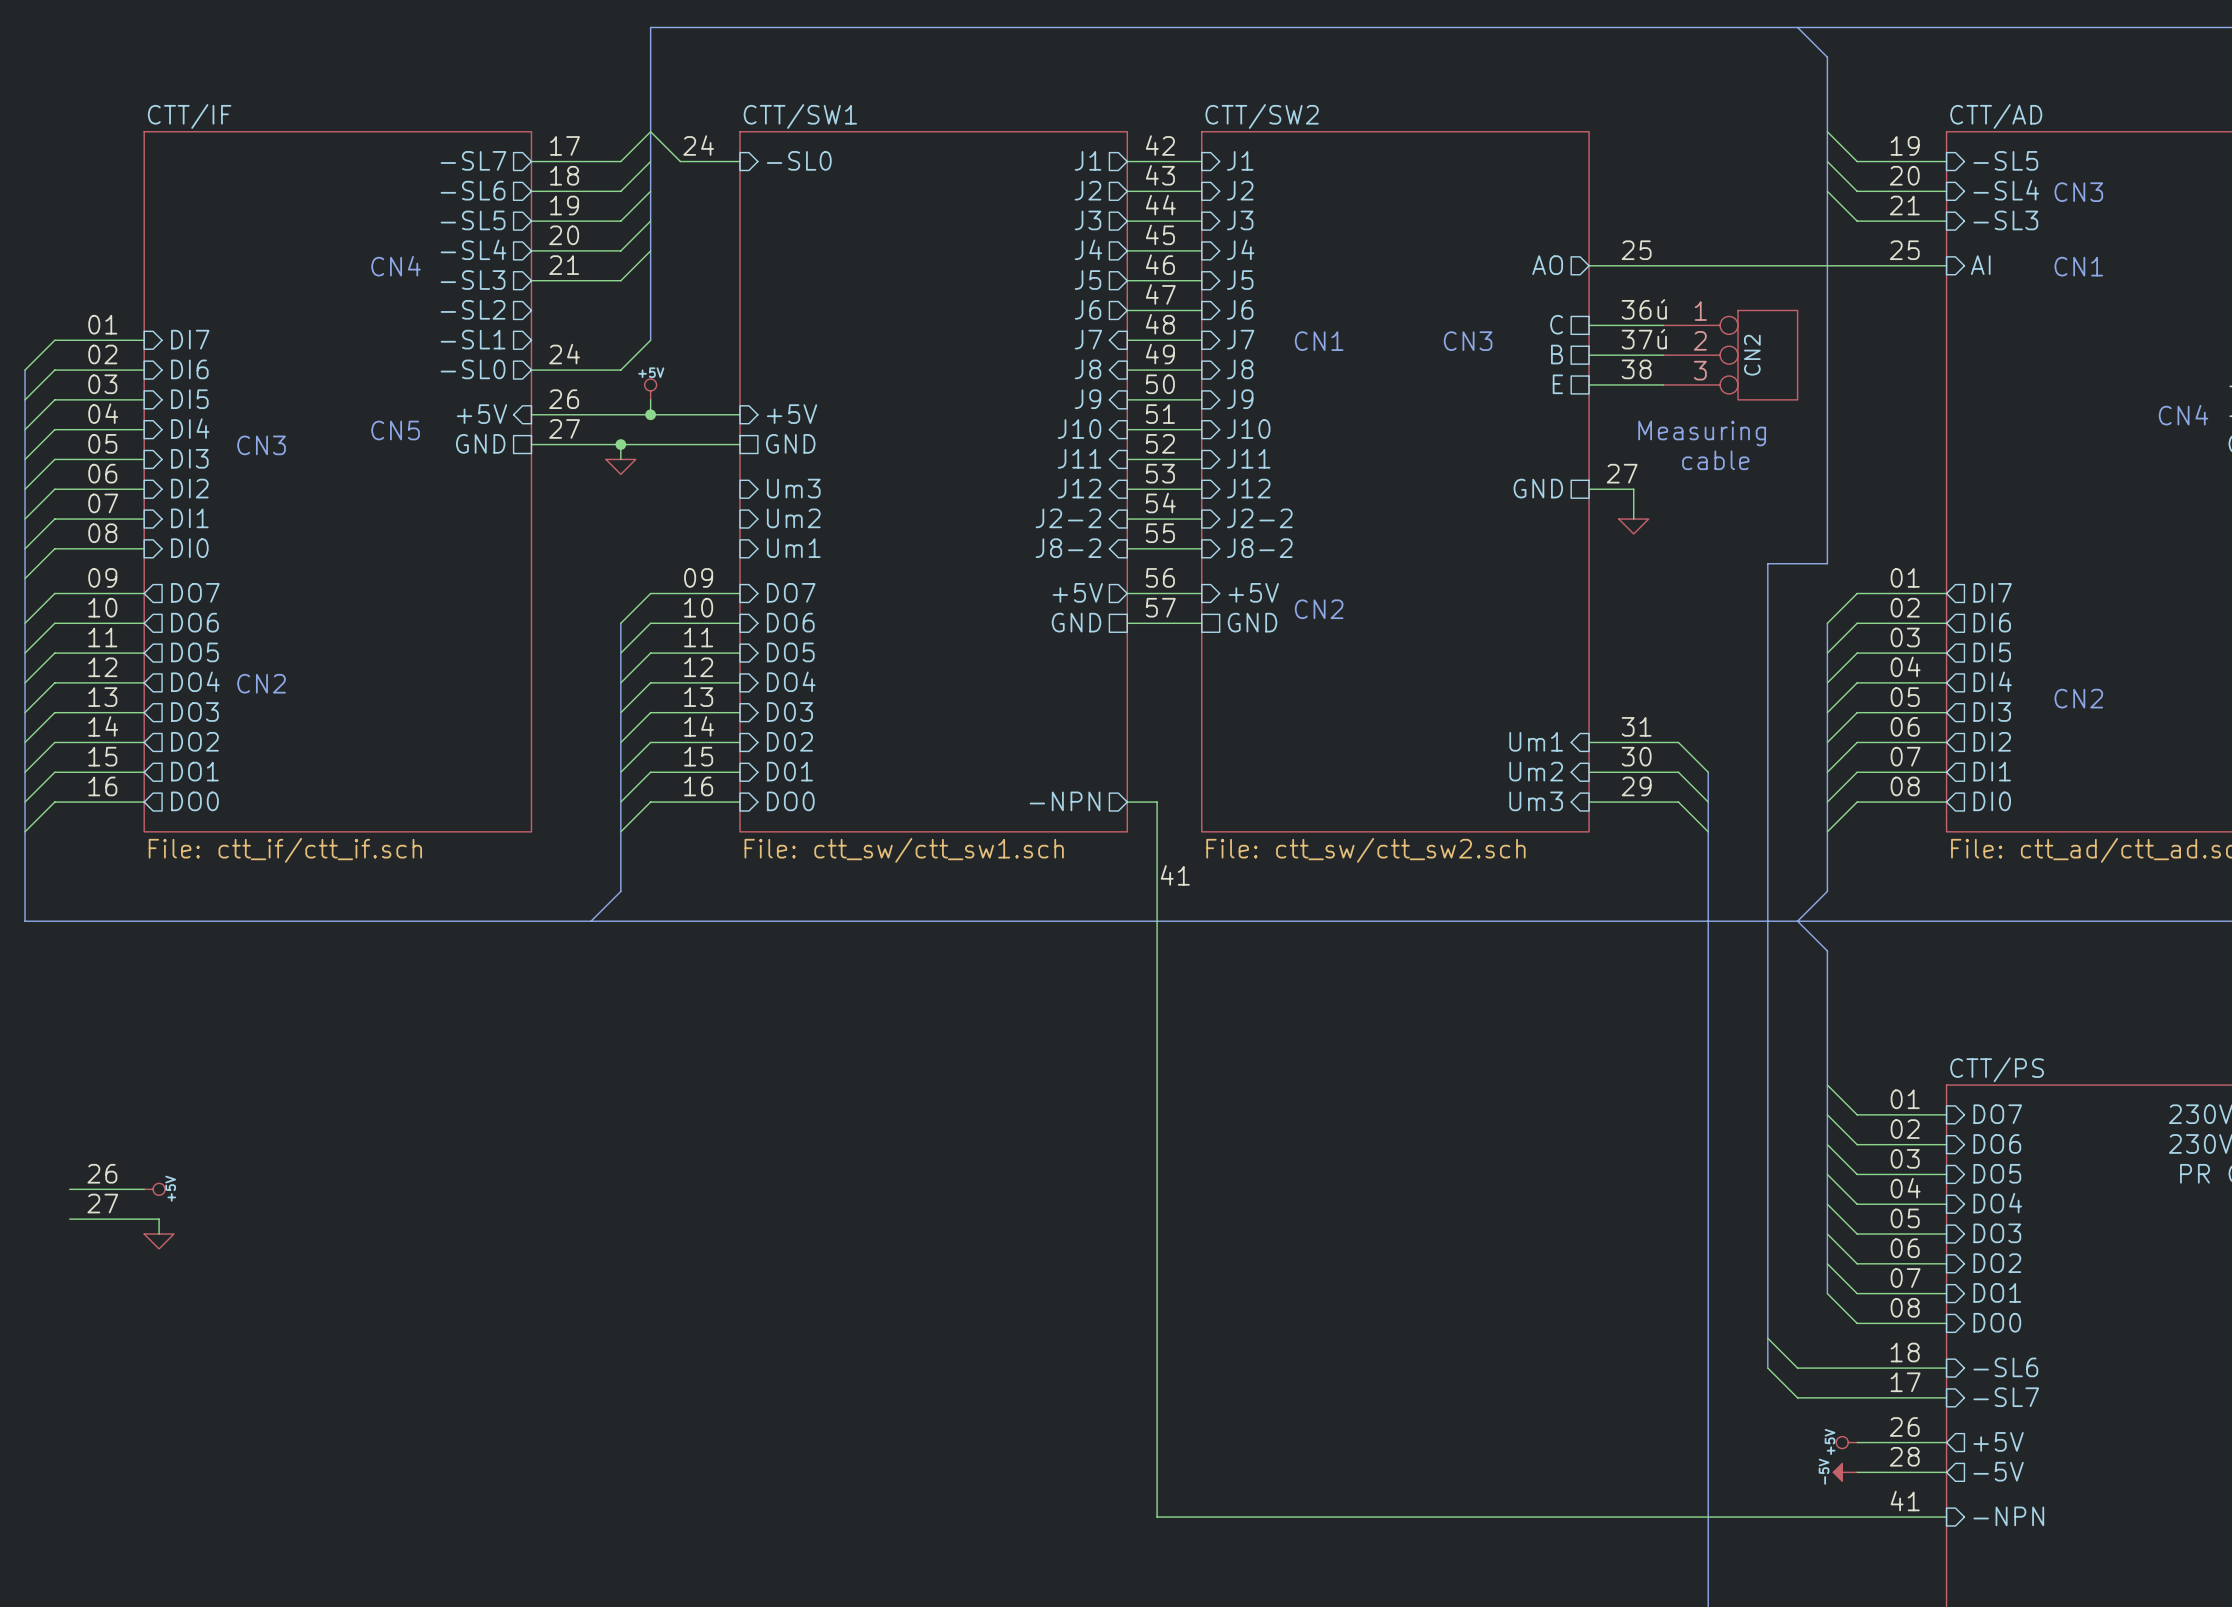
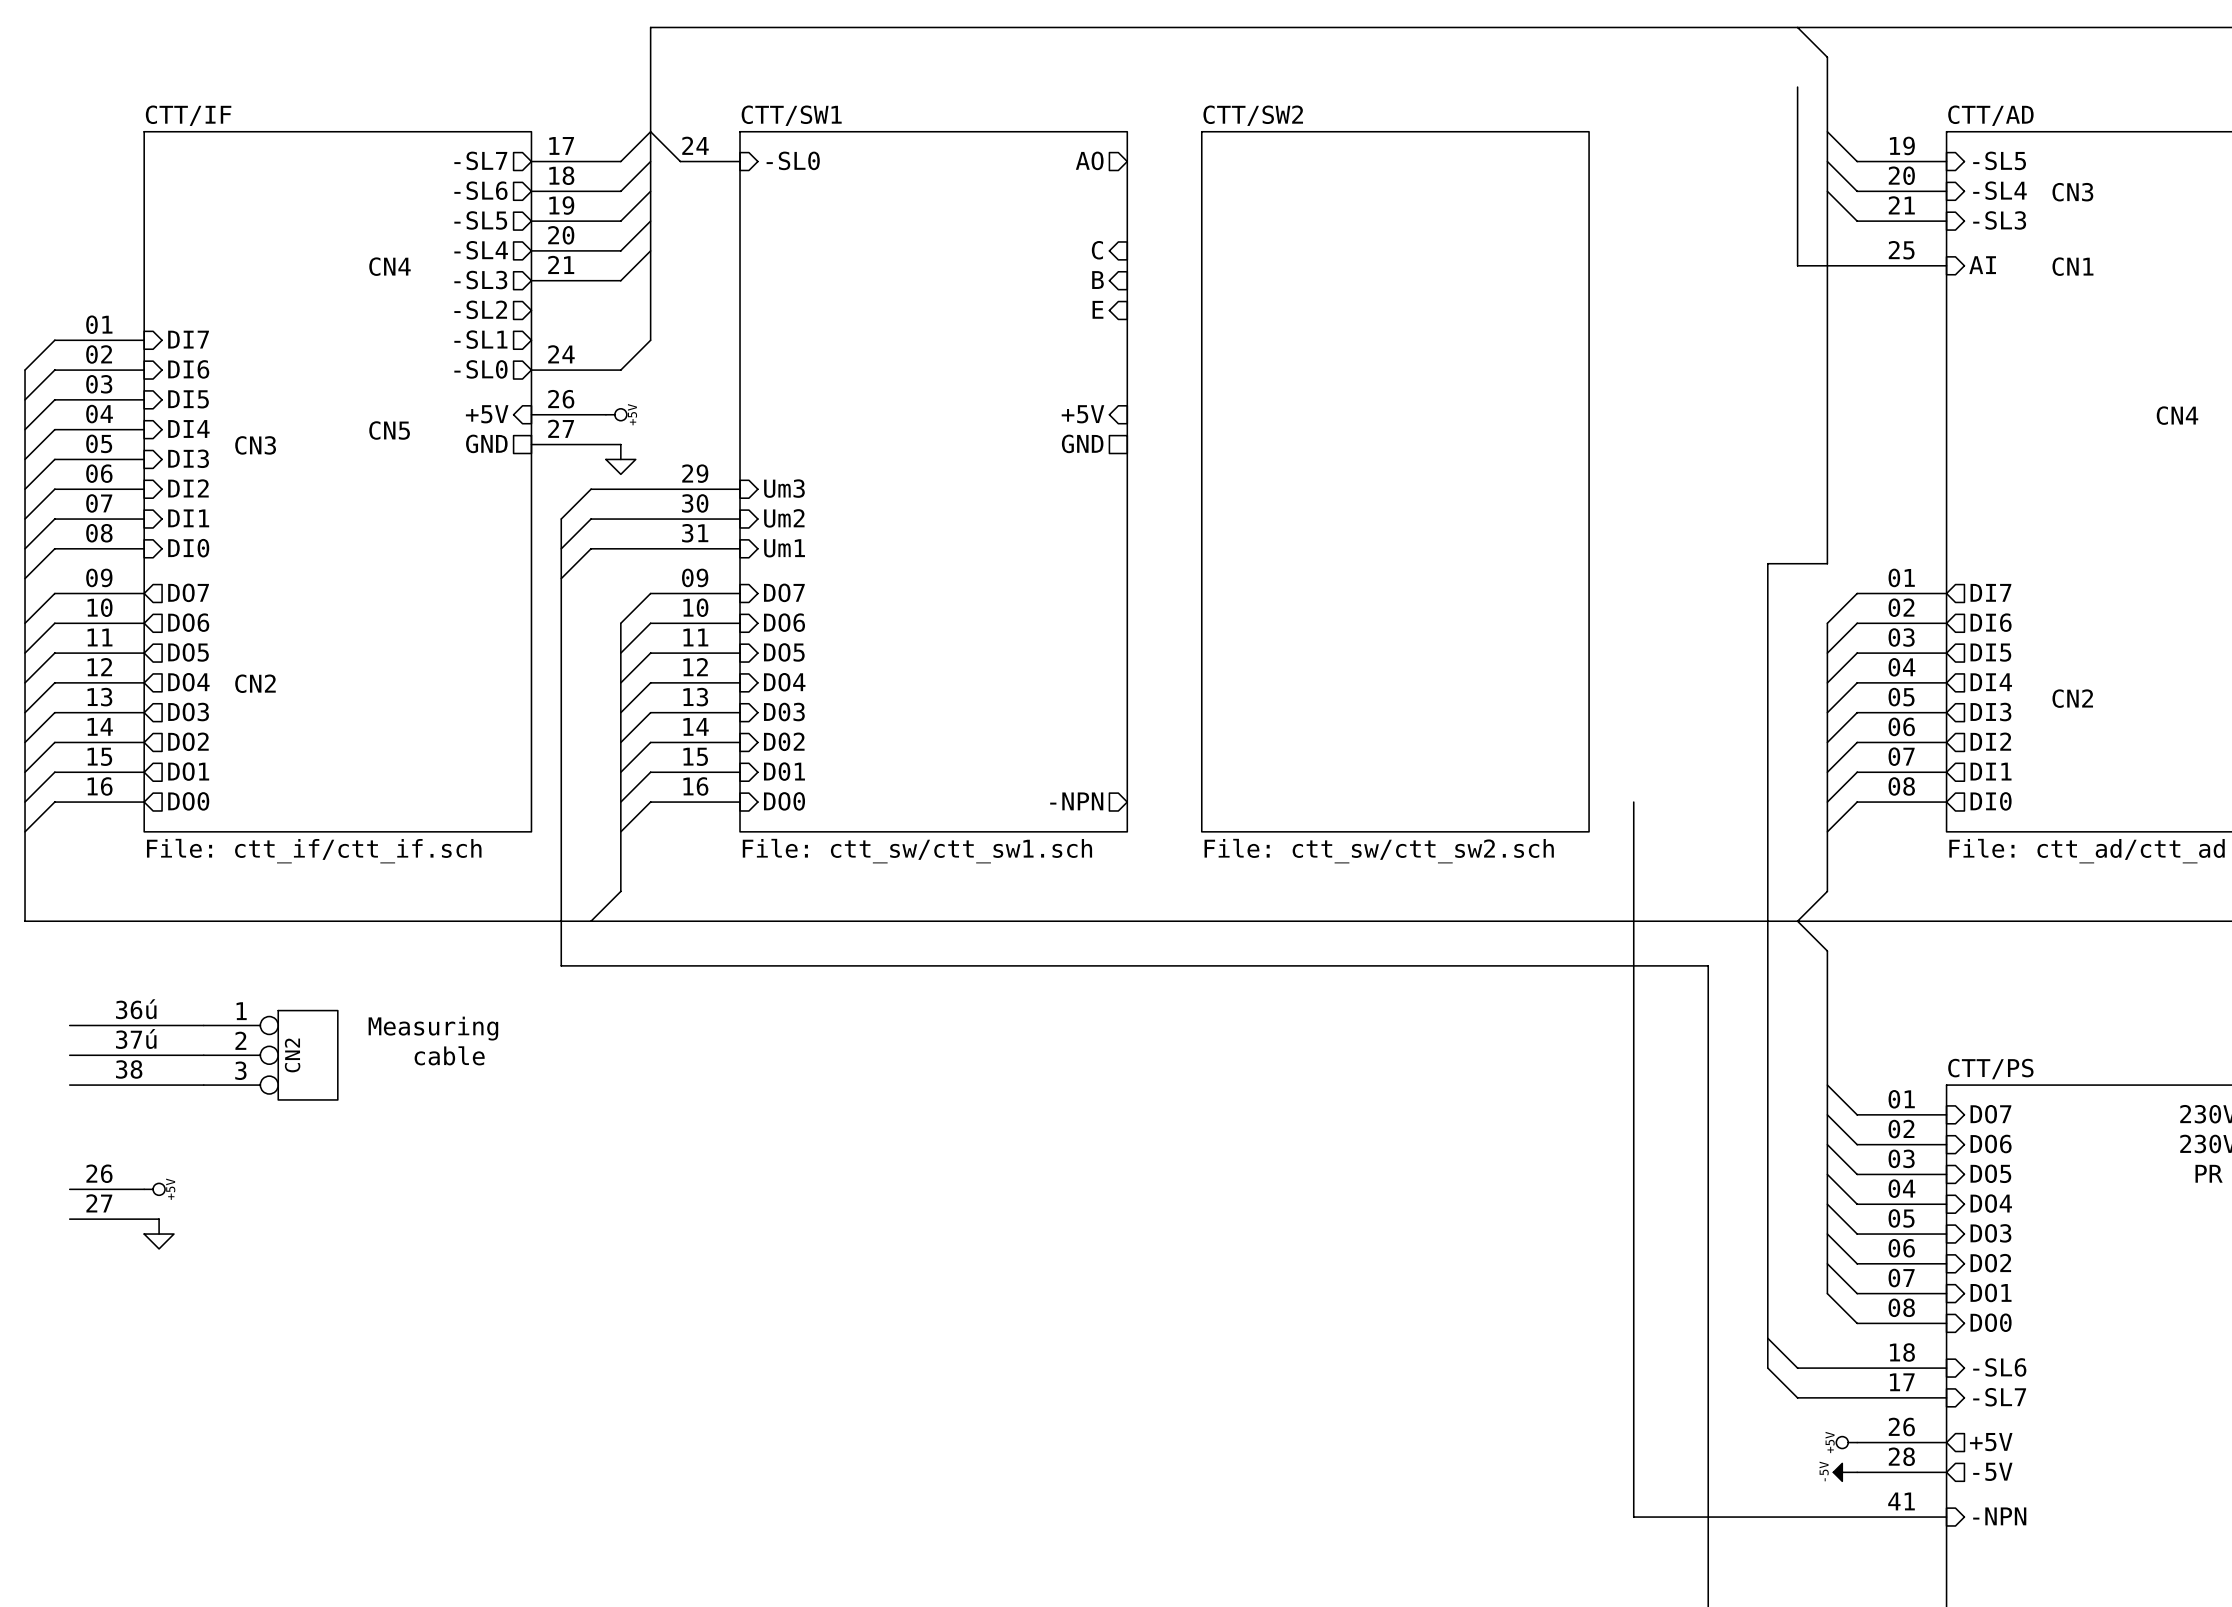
label: 42 (1160, 145) -> none
sheet pin: J1 (1088, 160) -> AO (1089, 160)
sheet pin: J1 (1240, 160) -> none
wire: (1127, 161) (1201, 161) -> none
label: 43 (1160, 175) -> none
sheet pin: J2 (1088, 190) -> none
sheet pin: J2 (1240, 190) -> none
wire: (1127, 191) (1201, 191) -> none
label: 44 (1160, 205) -> none
sheet pin: J3 (1088, 220) -> none
sheet pin: J3 (1240, 220) -> none
wire: (1127, 221) (1201, 221) -> none
label: 45 (1160, 234) -> none
sheet pin shape: output (1088, 249) -> input (1097, 250)
sheet pin: J4 (1088, 249) -> C (1097, 250)
sheet pin: J4 (1240, 249) -> none
wire: (1127, 250) (1201, 250) -> none
label: 25 (1636, 250) -> none
label: 46 (1160, 264) -> none
sheet pin: AO (1547, 265) -> none
wire: (1589, 265) (1797, 265) -> (1797, 87) (1797, 265)
sheet pin shape: output (1088, 280) -> input (1097, 280)
sheet pin: J5 (1088, 280) -> B (1097, 280)
wire: (1127, 280) (1201, 280) -> none
sheet pin: J5 (1240, 280) -> none
label: 47 (1160, 294) -> none
sheet pin shape: output (1088, 309) -> input (1097, 309)
sheet pin: J6 (1088, 309) -> E (1097, 309)
sheet pin: J6 (1240, 309) -> none
label: 36ú (1644, 309) -> none
wire: (1127, 310) (1201, 310) -> none
label: 48 (1160, 324) -> none
sheet pin: C (1556, 324) -> none
wire: (1589, 325) (1663, 325) -> none
sheet pin: J7 (1088, 339) -> none
sheet pin: J7 (1240, 339) -> none
label: 37ú (1644, 339) -> none
wire: (1127, 340) (1201, 340) -> none
text: CN1 (1319, 341) -> none
text: CN3 (1468, 341) -> none
label: 49 (1160, 354) -> none
sheet pin: B (1557, 354) -> none
wire: (1589, 355) (1663, 355) -> none
CN2 position: (1730, 355) -> (270, 1055)
sheet pin: J8 (1088, 369) -> none
sheet pin: J8 (1240, 369) -> none
label: 38 (1636, 369) -> none
wire: (1127, 370) (1201, 370) -> none
label: 50 (1160, 384) -> none
sheet pin: E (1557, 384) -> none
wire: (1589, 384) (1663, 384) -> none
power symbol rotation: 0° (650, 389) -> 90° clockwise (616, 414)
power symbol position: +5V (650, 389) -> +5V (616, 414)
wire: (650, 399) (650, 414) -> none
sheet pin: J9 (1088, 399) -> none
wire: (1127, 399) (1201, 399) -> none
sheet pin: J9 (1240, 399) -> none
wire: (605, 414) (740, 414) -> none
junction: (650, 414) -> none
sheet pin: +5V (792, 414) -> none
sheet pin: none -> +5V (1082, 414)
label: 51 (1160, 414) -> none
sheet pin: J10 (1079, 428) -> none
sheet pin: J10 (1248, 428) -> none
wire: (1127, 429) (1201, 429) -> none
text: Measuring (1702, 433) -> none
sheet pin: GND (790, 443) -> none
sheet pin: none -> GND (1082, 443)
label: 52 (1160, 443) -> none
wire: (620, 444) (740, 444) -> none
junction: (620, 444) -> none
sheet pin: J11 (1079, 458) -> none
sheet pin: J11 (1248, 458) -> none
wire: (1127, 459) (1201, 459) -> none
text: cable (1715, 460) -> none
label: none -> 29 (695, 473)
label: 53 (1160, 473) -> none
label: 27 (1622, 473) -> none
sheet pin: J12 (1079, 488) -> none
sheet pin: J12 (1248, 488) -> none
sheet pin: GND (1538, 488) -> none
wire: none -> (740, 489) (591, 489) (561, 519)
wire: (1127, 489) (1201, 489) -> none
wire: (1589, 489) (1633, 489) (1633, 519) -> none
label: none -> 30 (695, 503)
label: 54 (1160, 503) -> none
sheet pin: J2-2 (1068, 518) -> none
sheet pin: J2-2 (1259, 518) -> none
wire: none -> (740, 519) (591, 519) (561, 548)
wire: (1127, 519) (1201, 519) -> none
power symbol: (1633, 526) -> none
label: none -> 31 (695, 533)
label: 55 (1160, 533) -> none
wire: none -> (740, 548) (591, 548) (561, 578)
sheet pin: J8-2 (1068, 548) -> none
wire: (1127, 548) (1201, 548) -> none
sheet pin: J8-2 (1259, 548) -> none
label: 56 (1160, 577) -> none
sheet pin: +5V (1077, 592) -> none
sheet pin: +5V (1253, 592) -> none
wire: (1127, 593) (1201, 593) -> none
label: 57 (1160, 607) -> none
text: CN2 (1319, 609) -> none
sheet pin: GND (1076, 622) -> none
sheet pin: GND (1252, 622) -> none
wire: (1127, 623) (1201, 623) -> none
label: 31 (1636, 726) -> none
sheet pin: Um1 (1536, 741) -> none
wire: (1589, 742) (1678, 742) (1708, 772) -> none
label: 30 (1636, 756) -> none
sheet pin: Um2 (1536, 771) -> none
wire: (1589, 772) (1678, 772) (1708, 802) -> none
bus: (1708, 772) (1708, 965) -> (561, 519) (561, 965) (1708, 965)
label: 29 (1636, 786) -> none
sheet pin: Um3 (1536, 801) -> none
wire: (1127, 802) (1157, 802) (1157, 1517) (1633, 1517) -> (1633, 802) (1633, 1517)
wire: (1589, 802) (1678, 802) (1708, 831) -> none
label: 41 (1175, 875) -> none
label: none -> 36ú (136, 1009)
wire: none -> (69, 1025) (203, 1025)
text: none -> Measuring (433, 1028)
label: none -> 37ú (136, 1038)
wire: none -> (69, 1055) (203, 1055)
text: none -> cable (449, 1055)
label: none -> 38 (129, 1069)
wire: none -> (69, 1085) (203, 1085)

